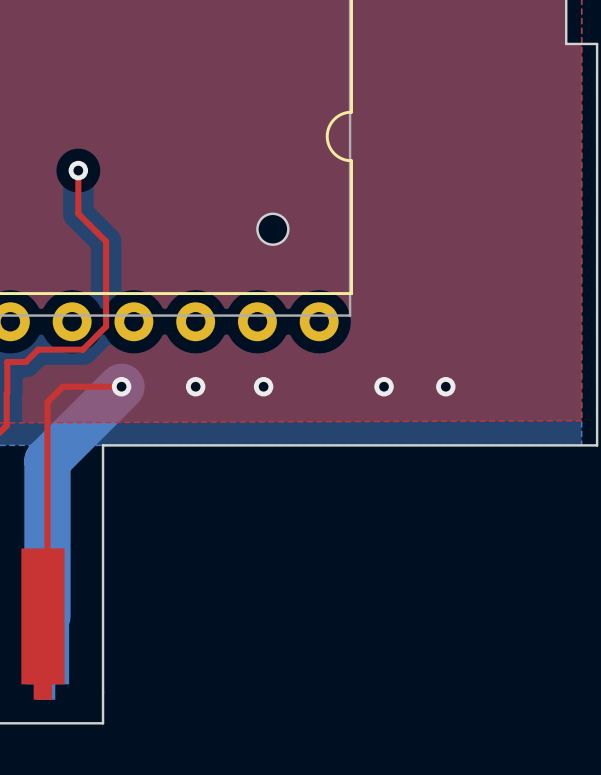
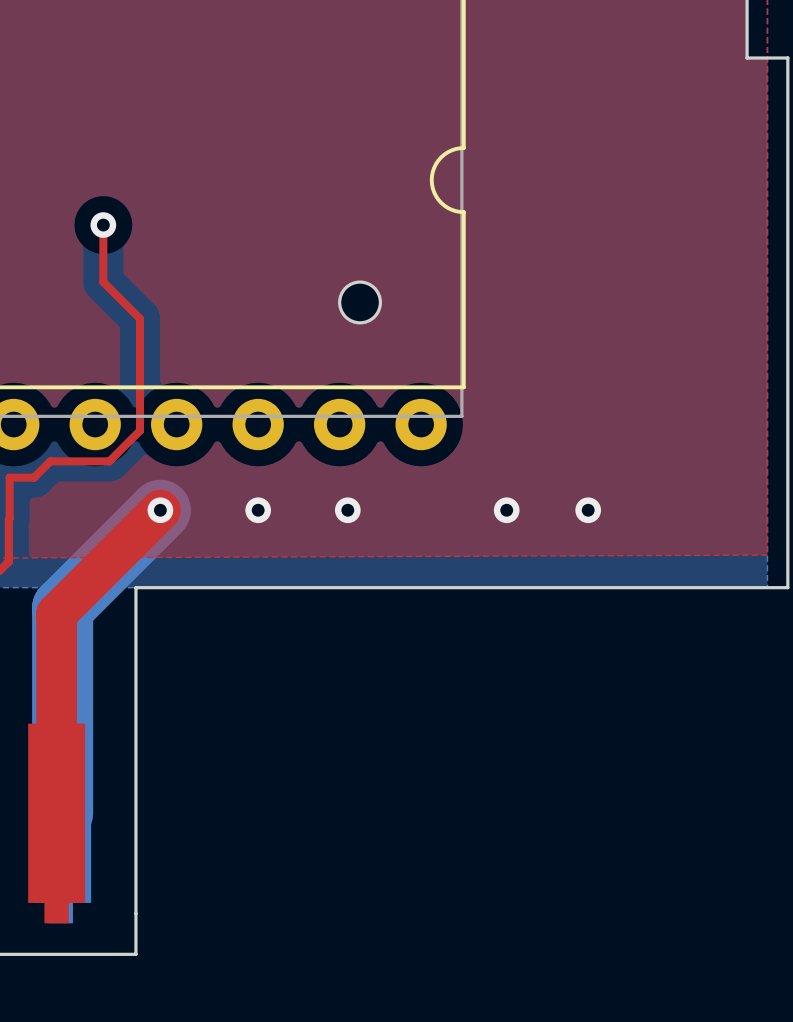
top track: (121, 386) (62, 386) (47, 402) (47, 616) -> (160, 510) (56, 614) (56, 813)

